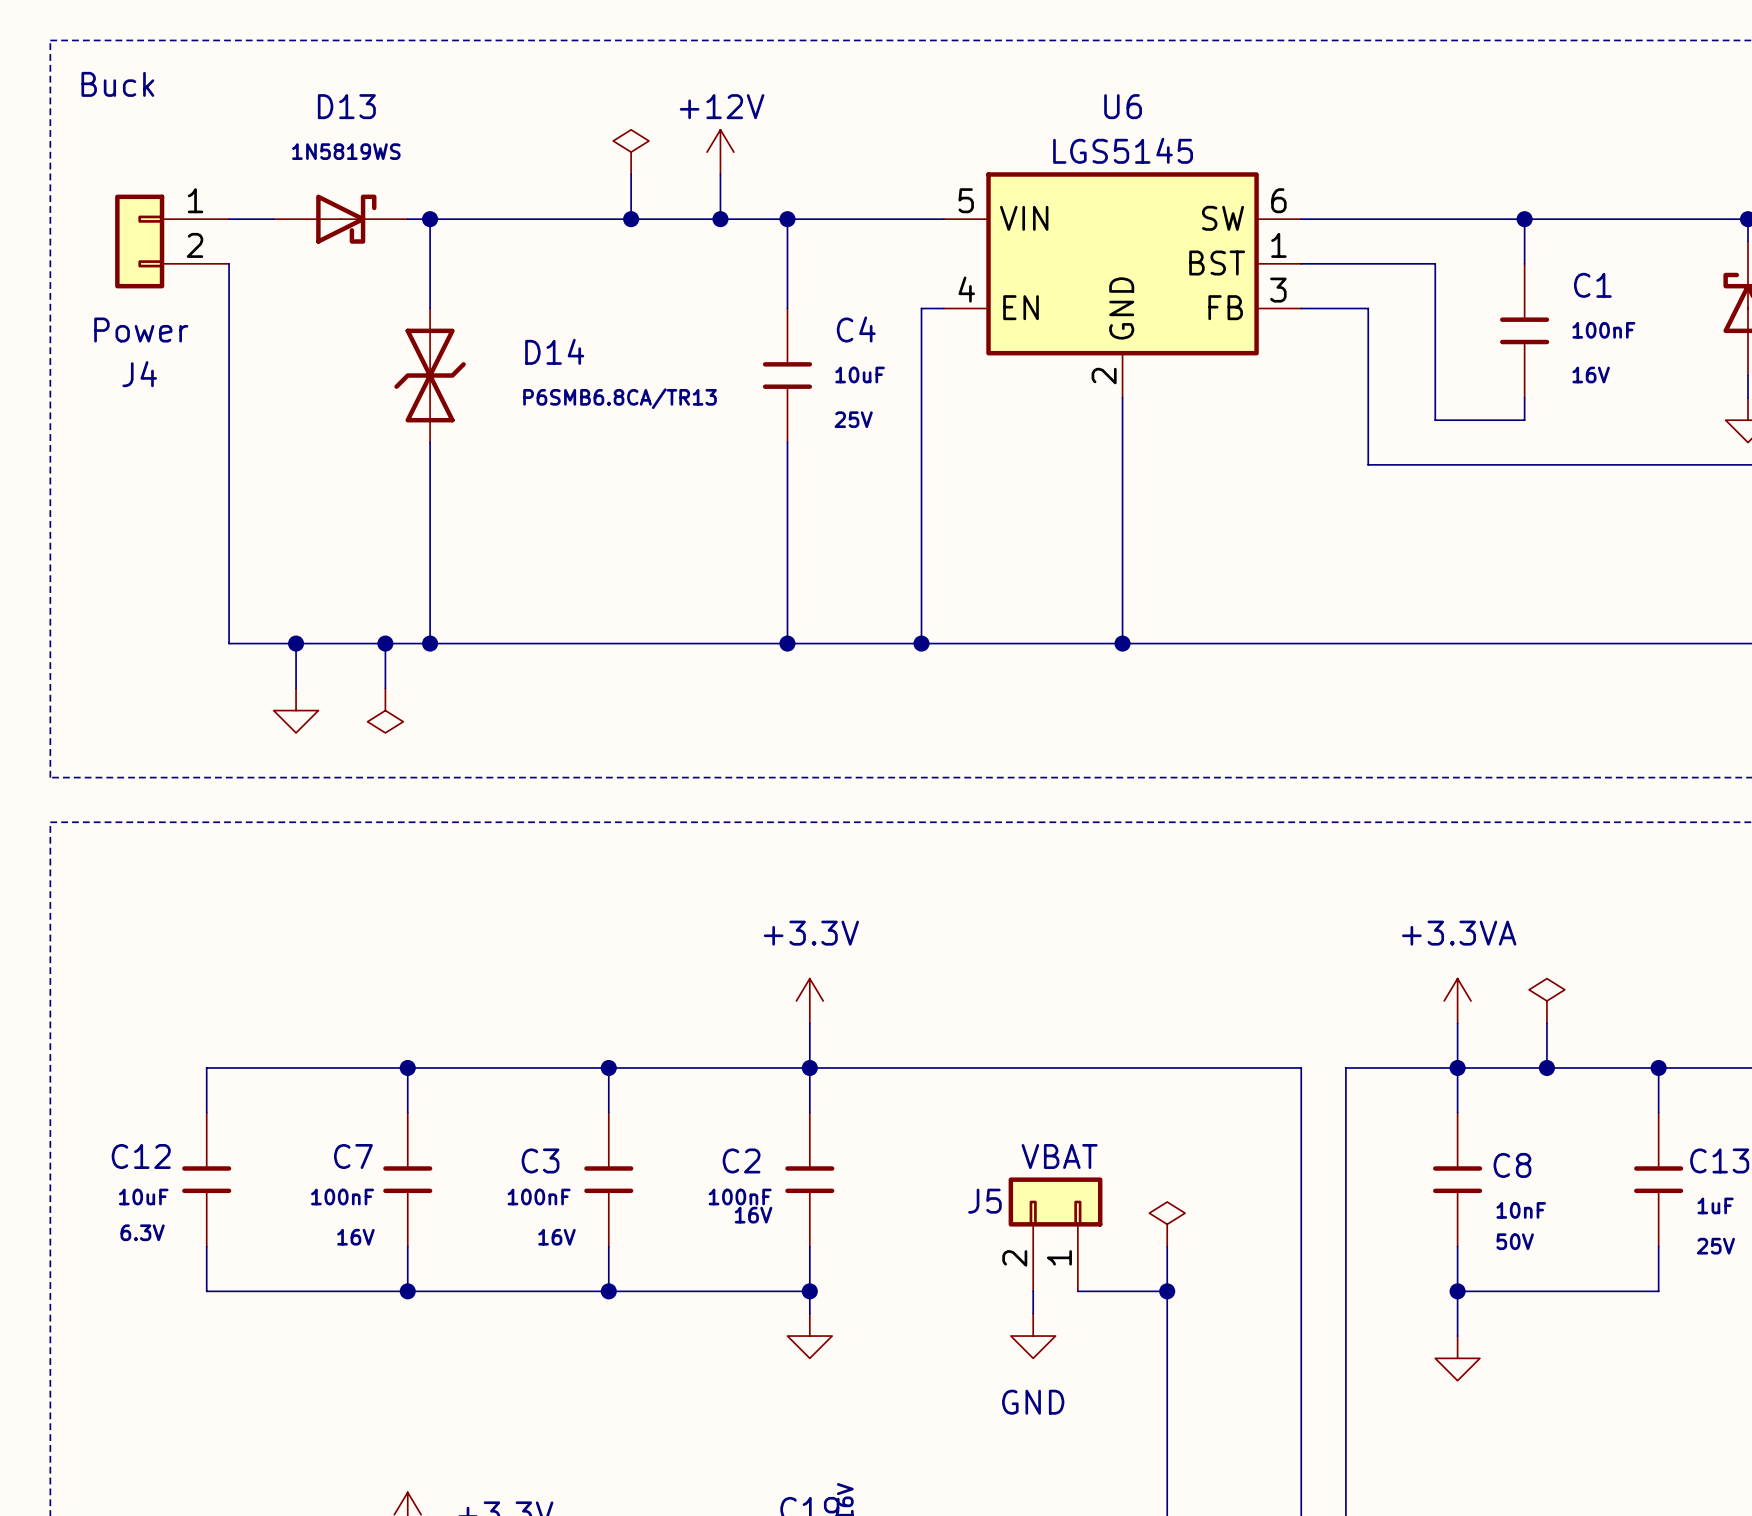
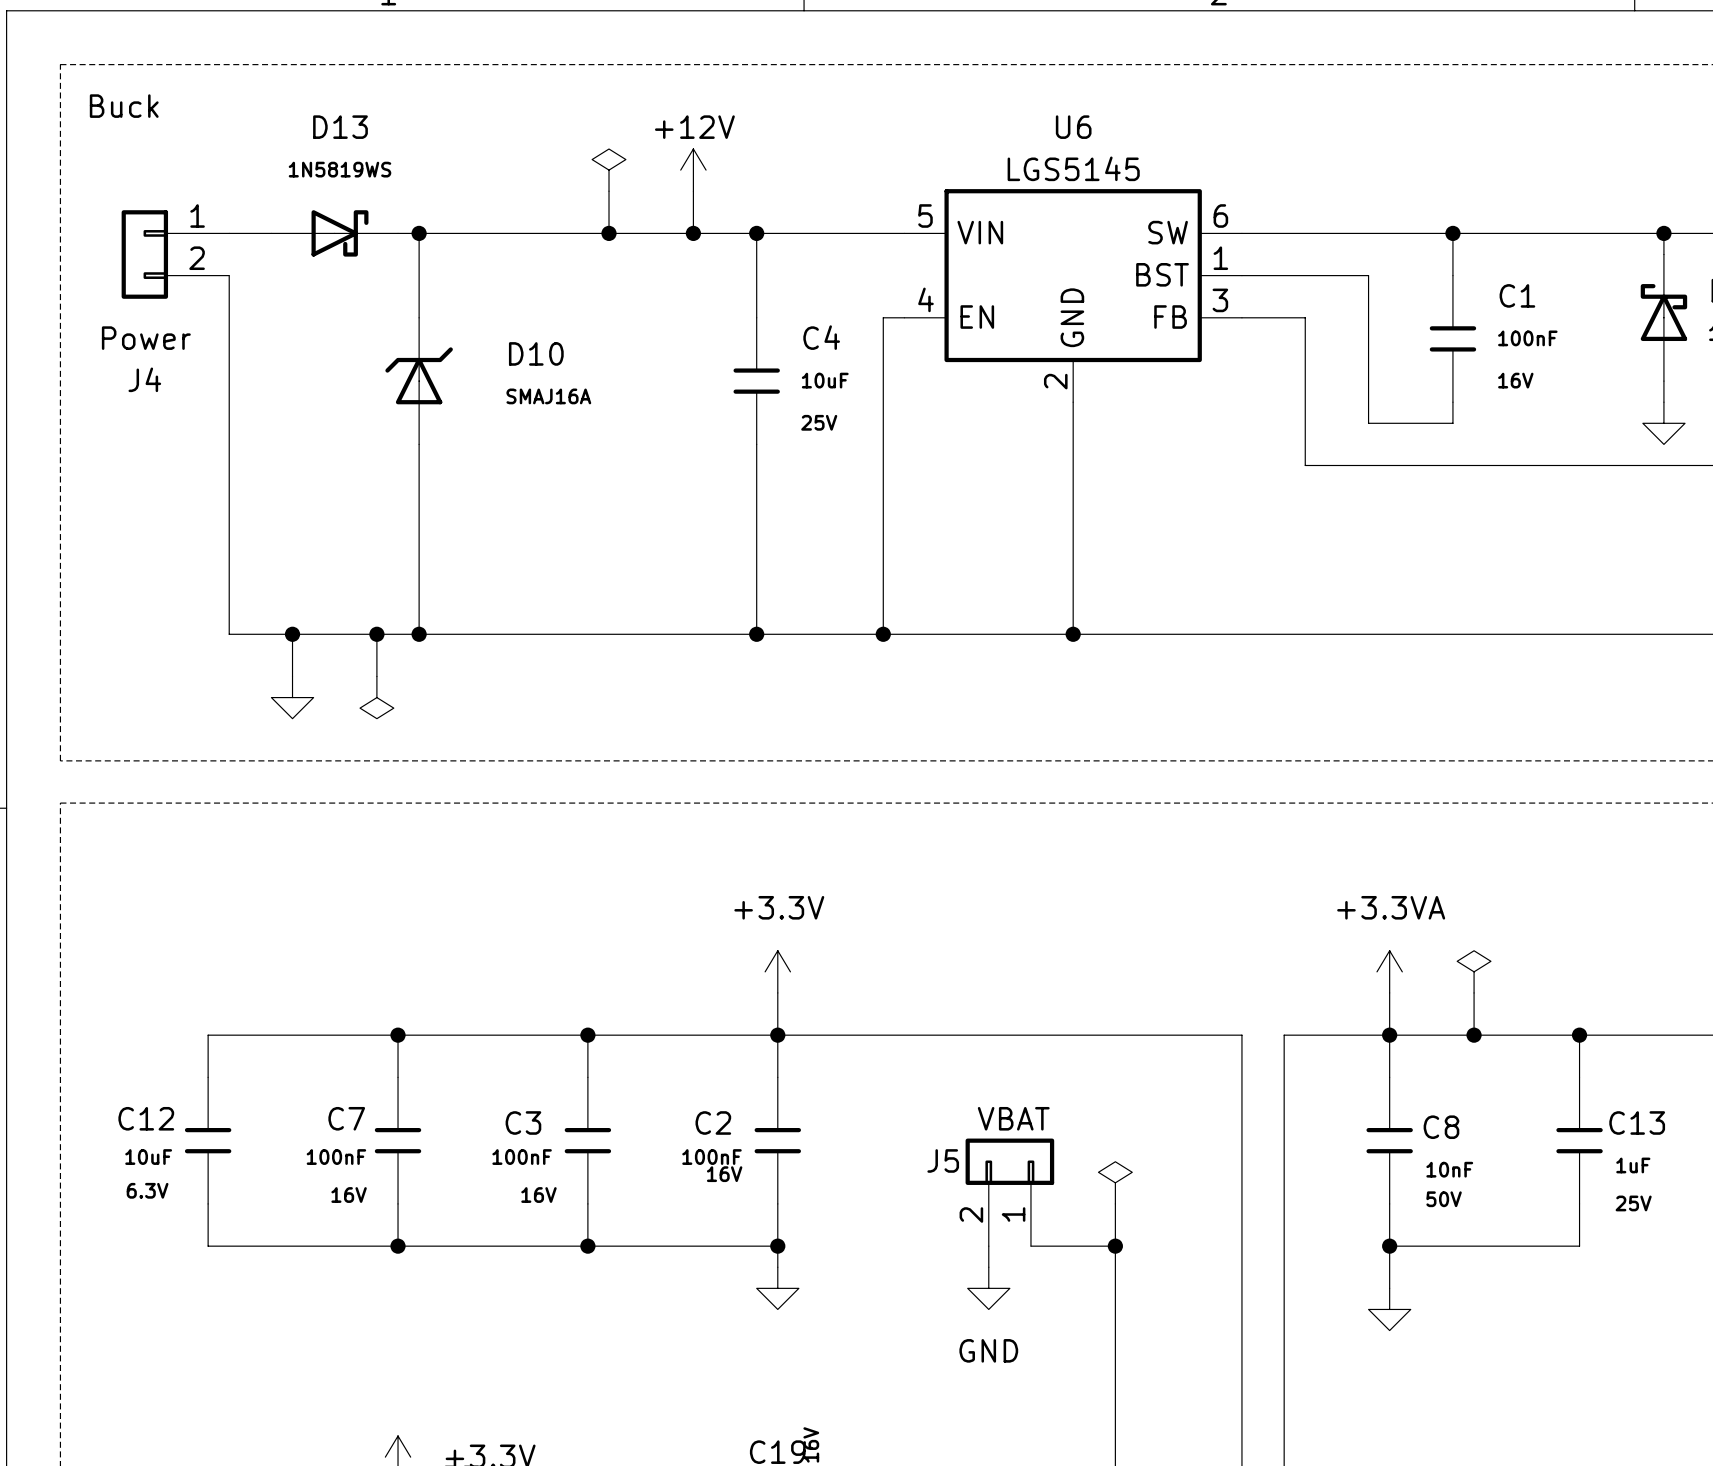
D14: P6SMB6.8CA/TR13 (430, 375) -> none
D10: none -> SMAJ16A (419, 381)

